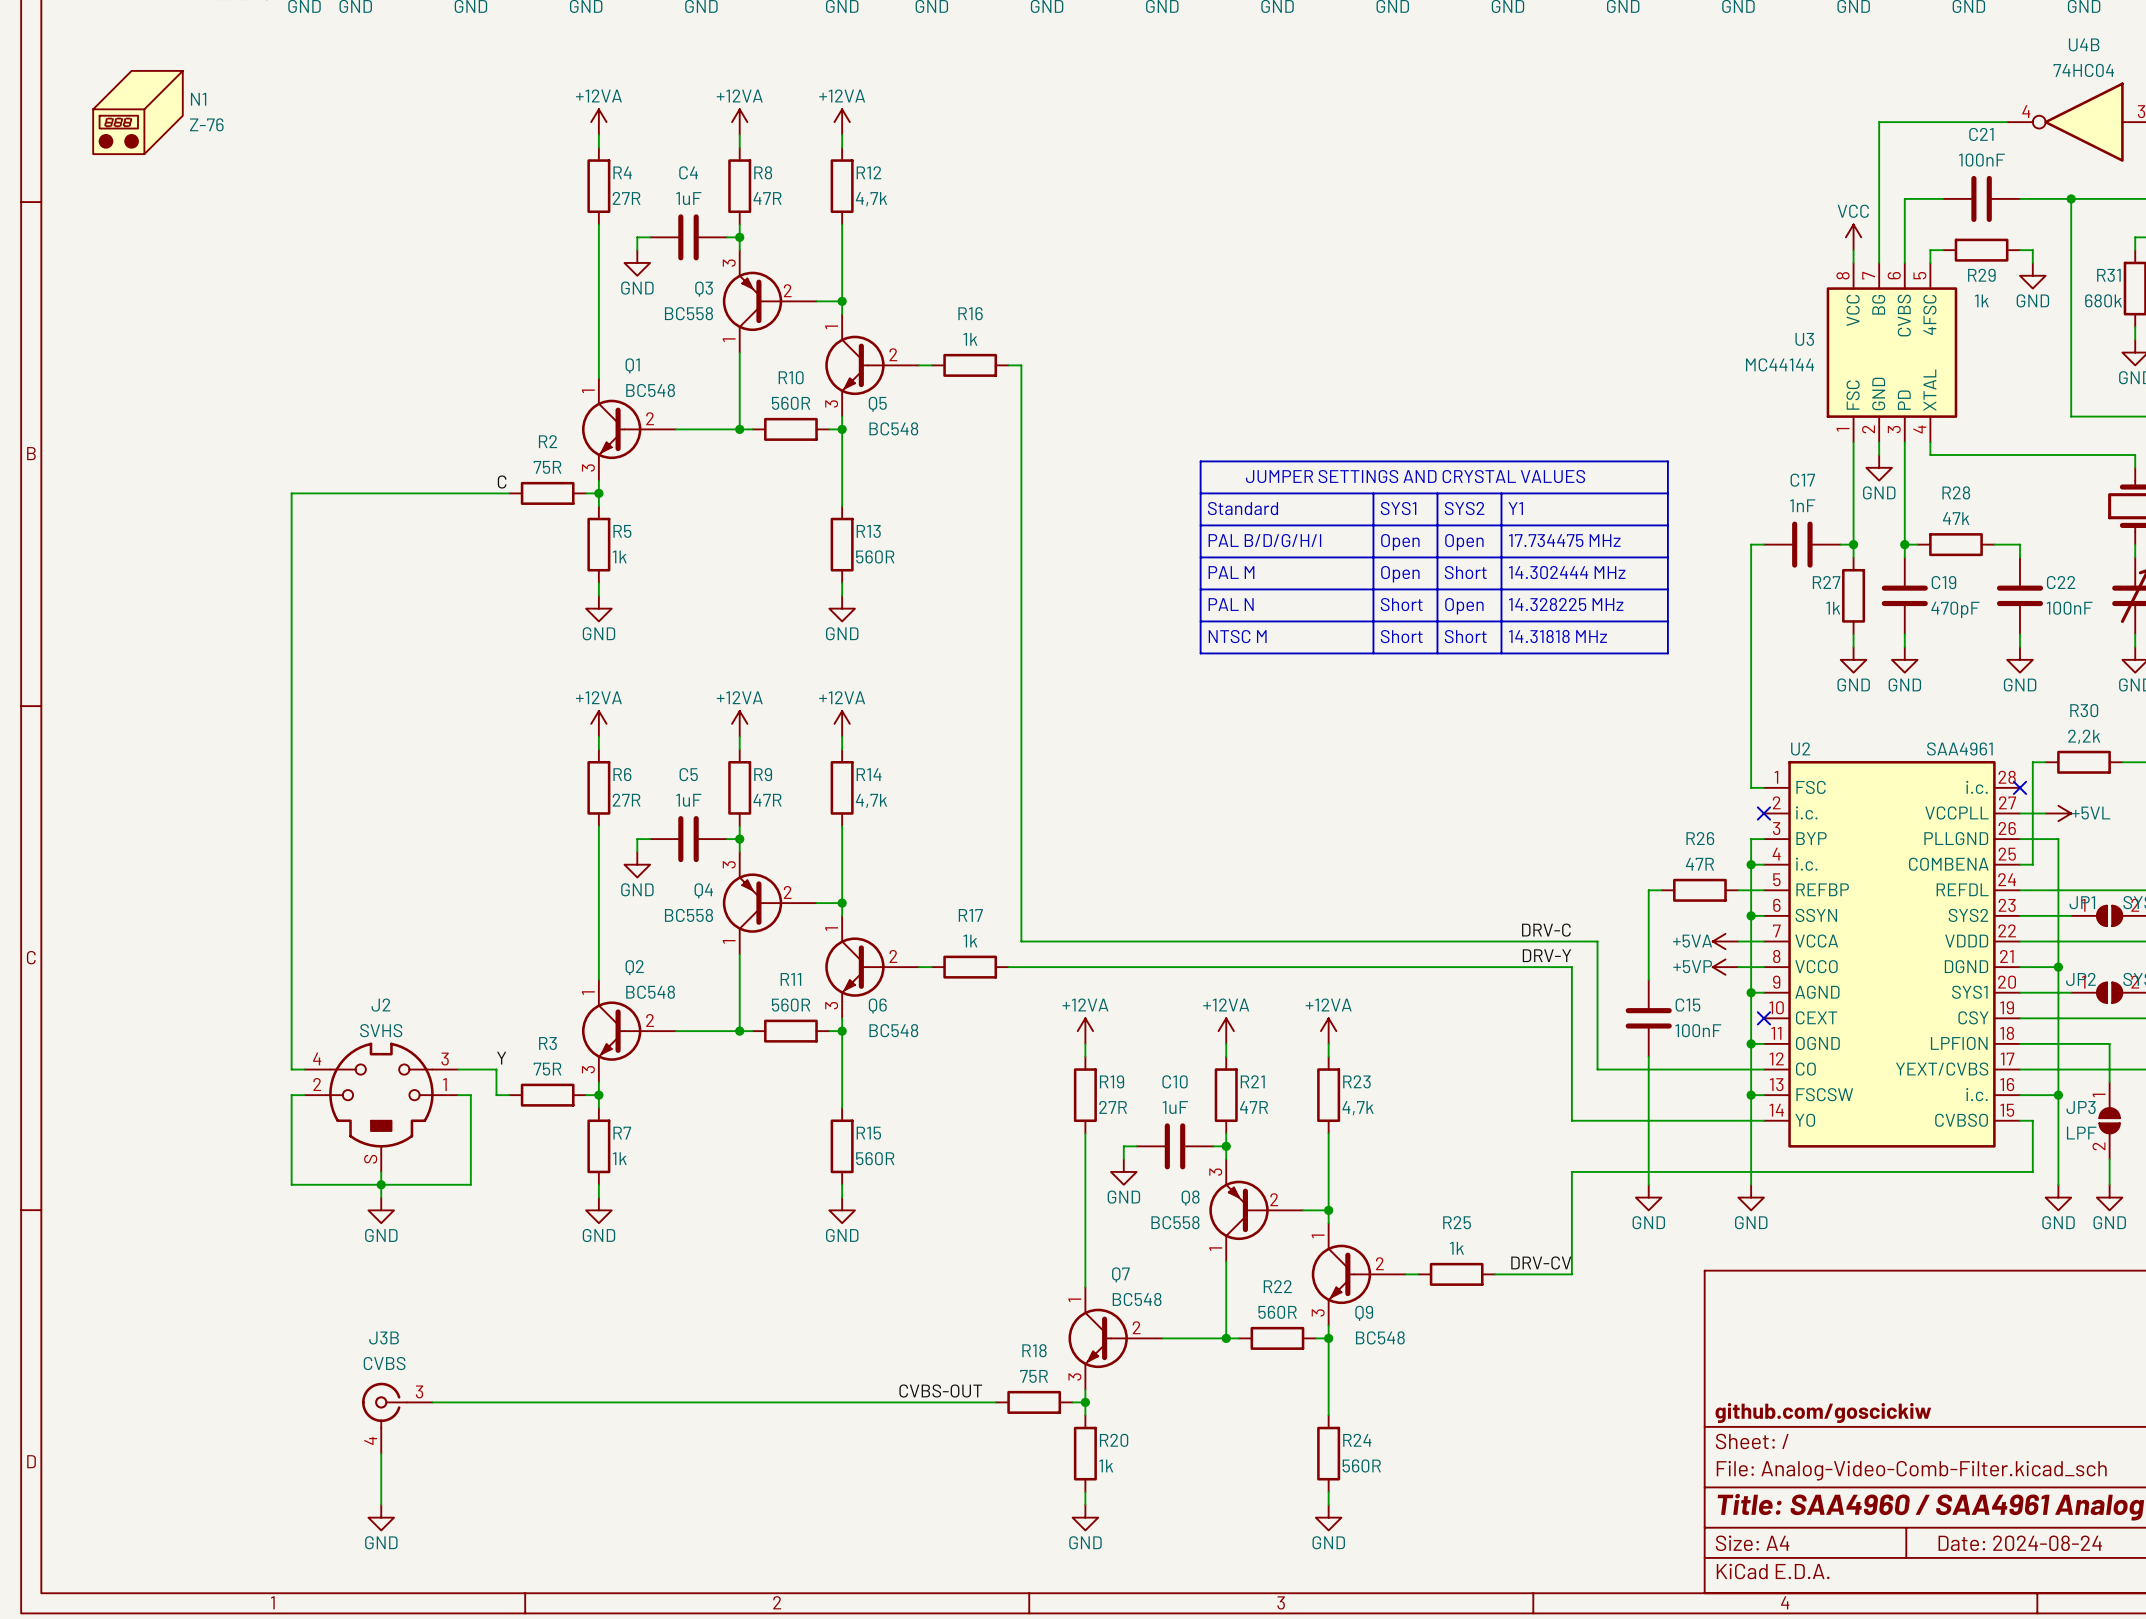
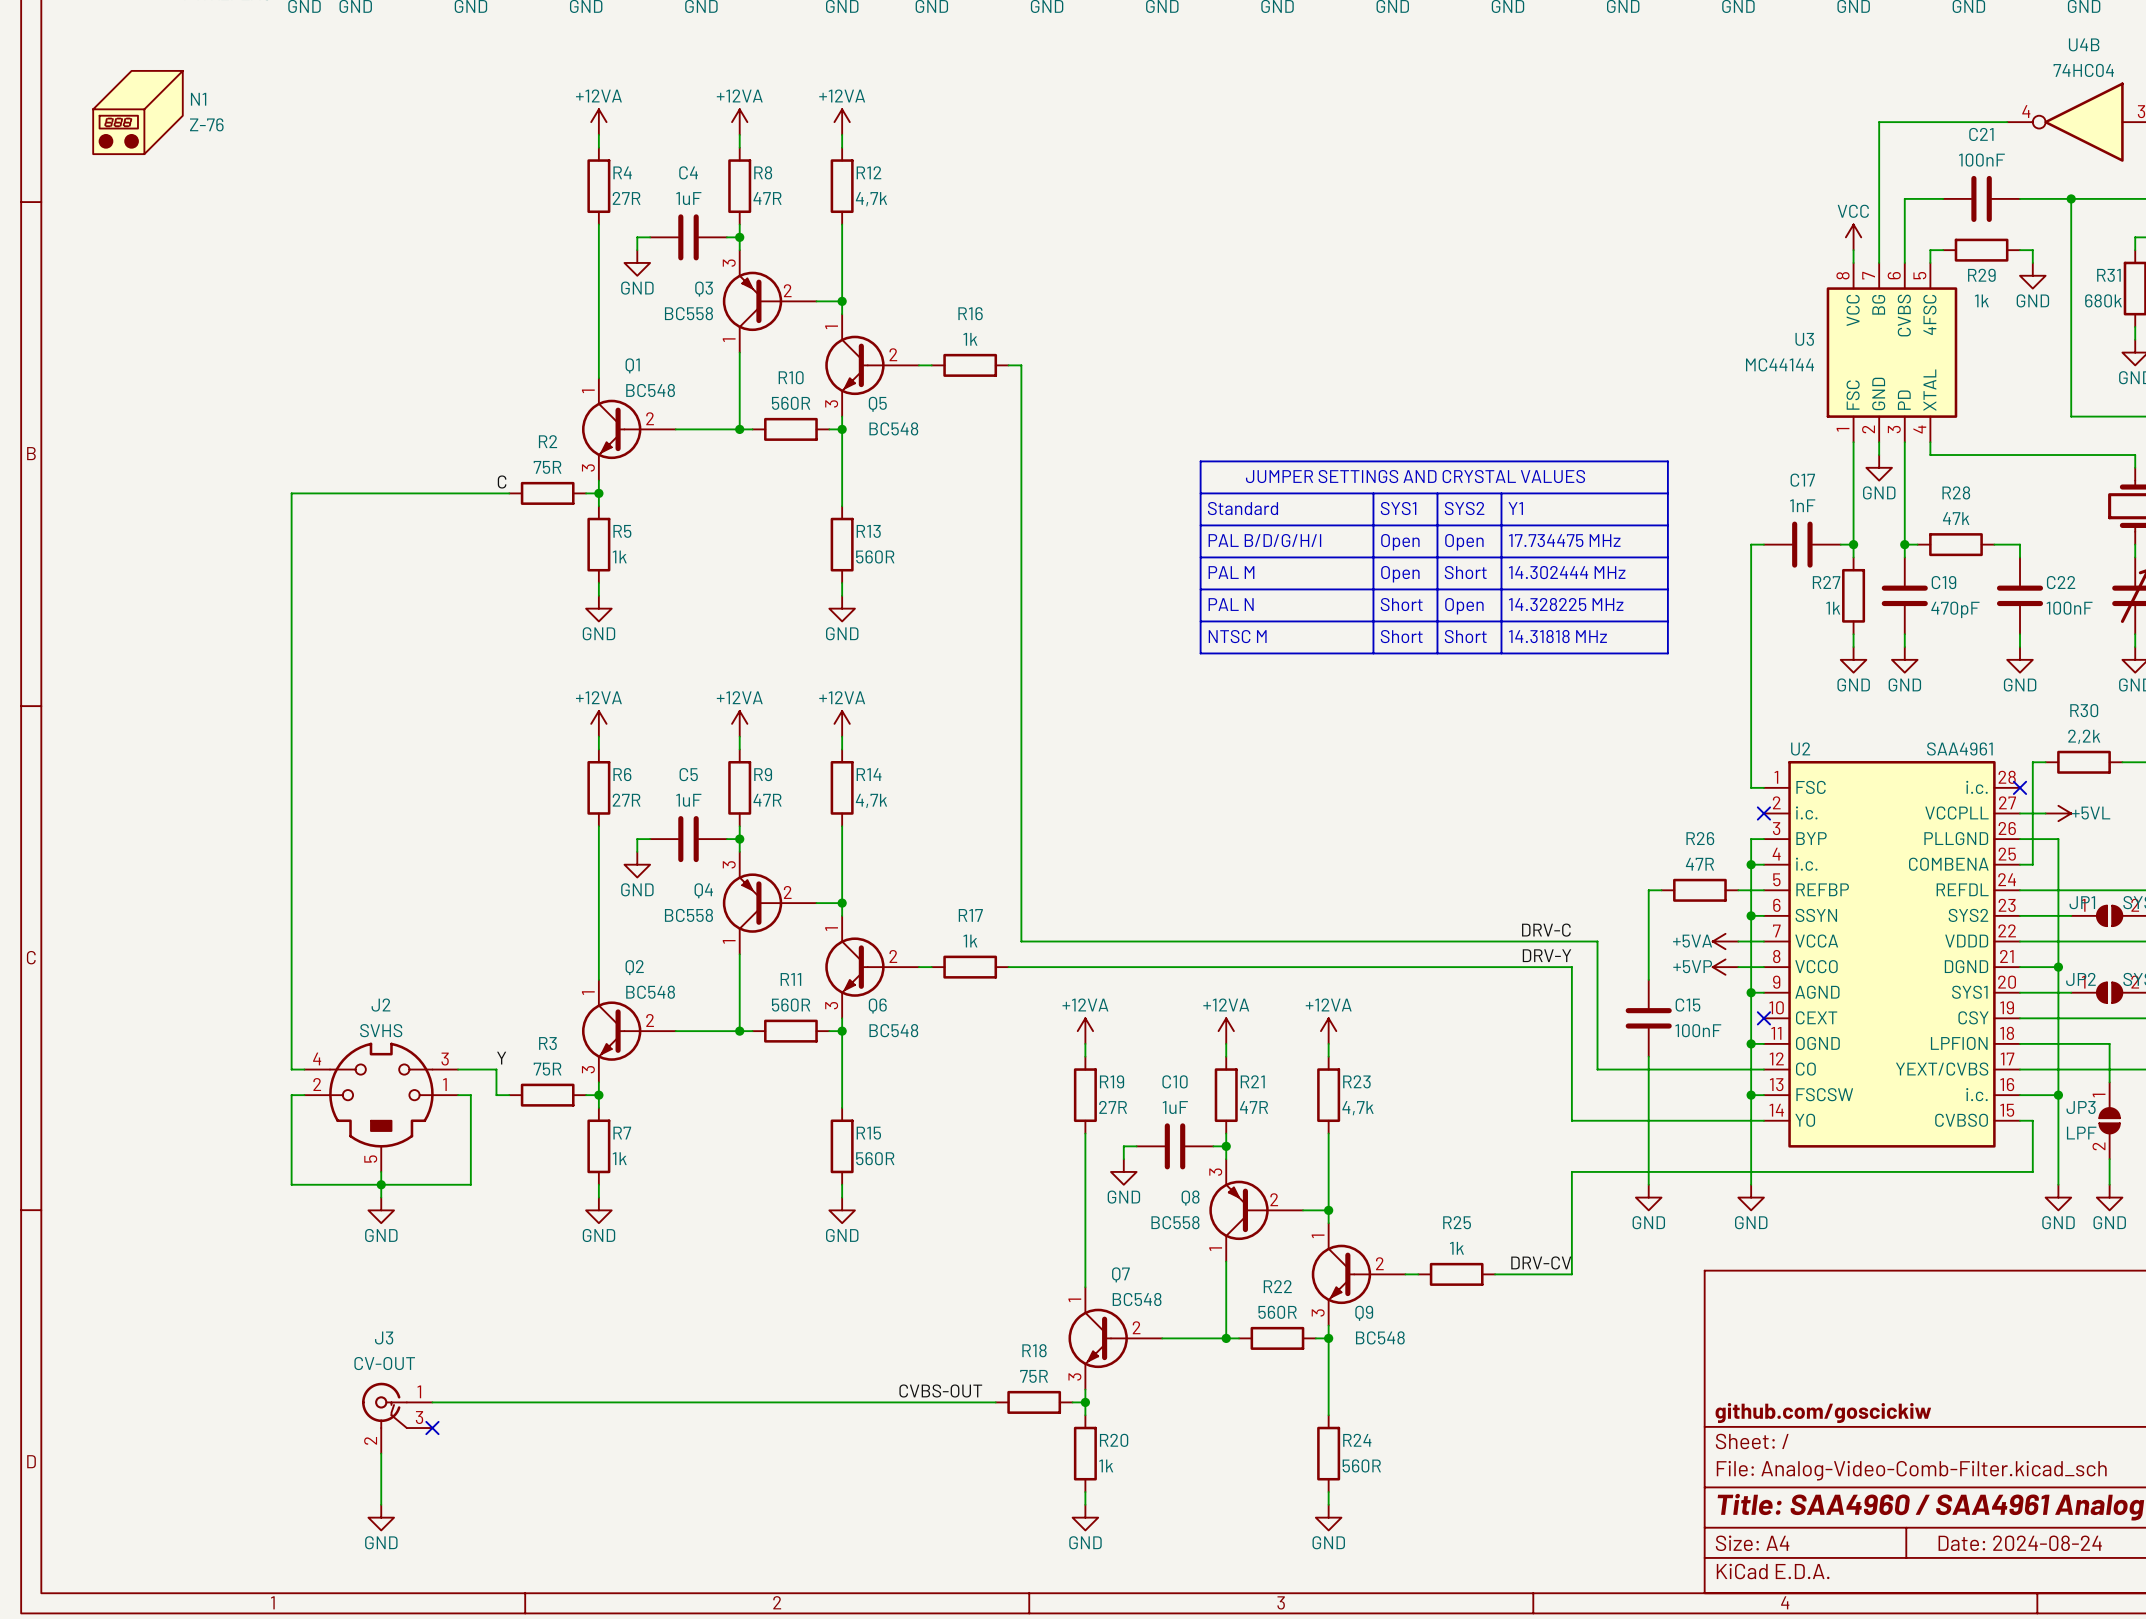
J2 pin number: S (370, 1159) -> 5 (370, 1159)
J3B: CVBS (397, 1418) -> none
J3: none -> CV-OUT (397, 1418)
no-connect mark: none -> (432, 1428)

